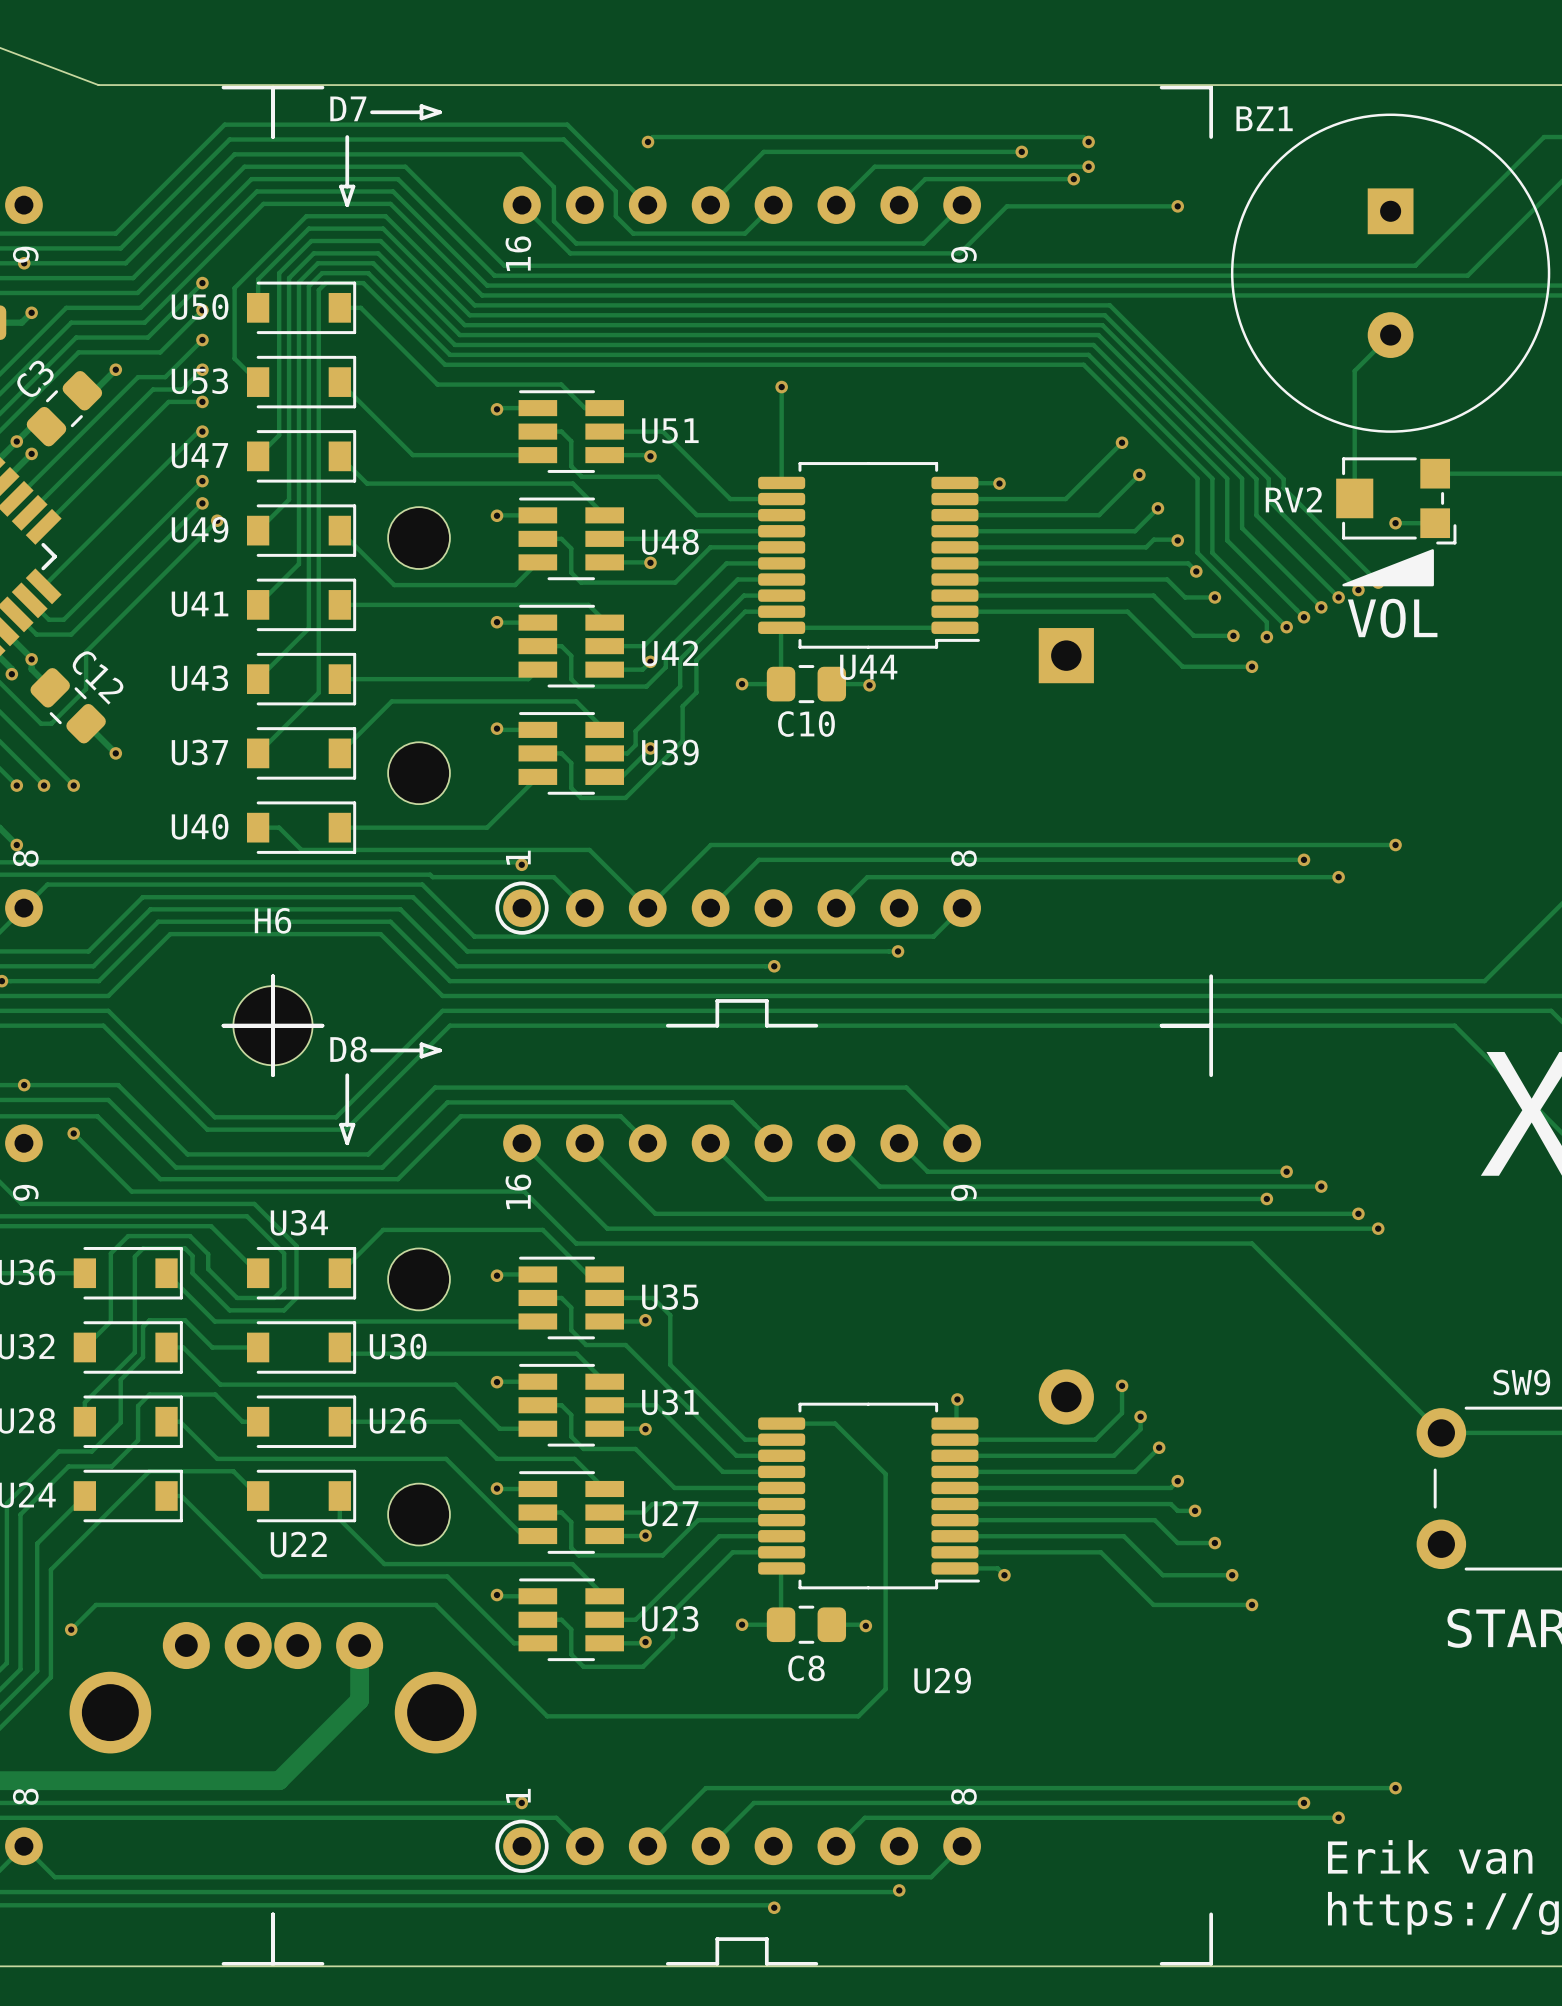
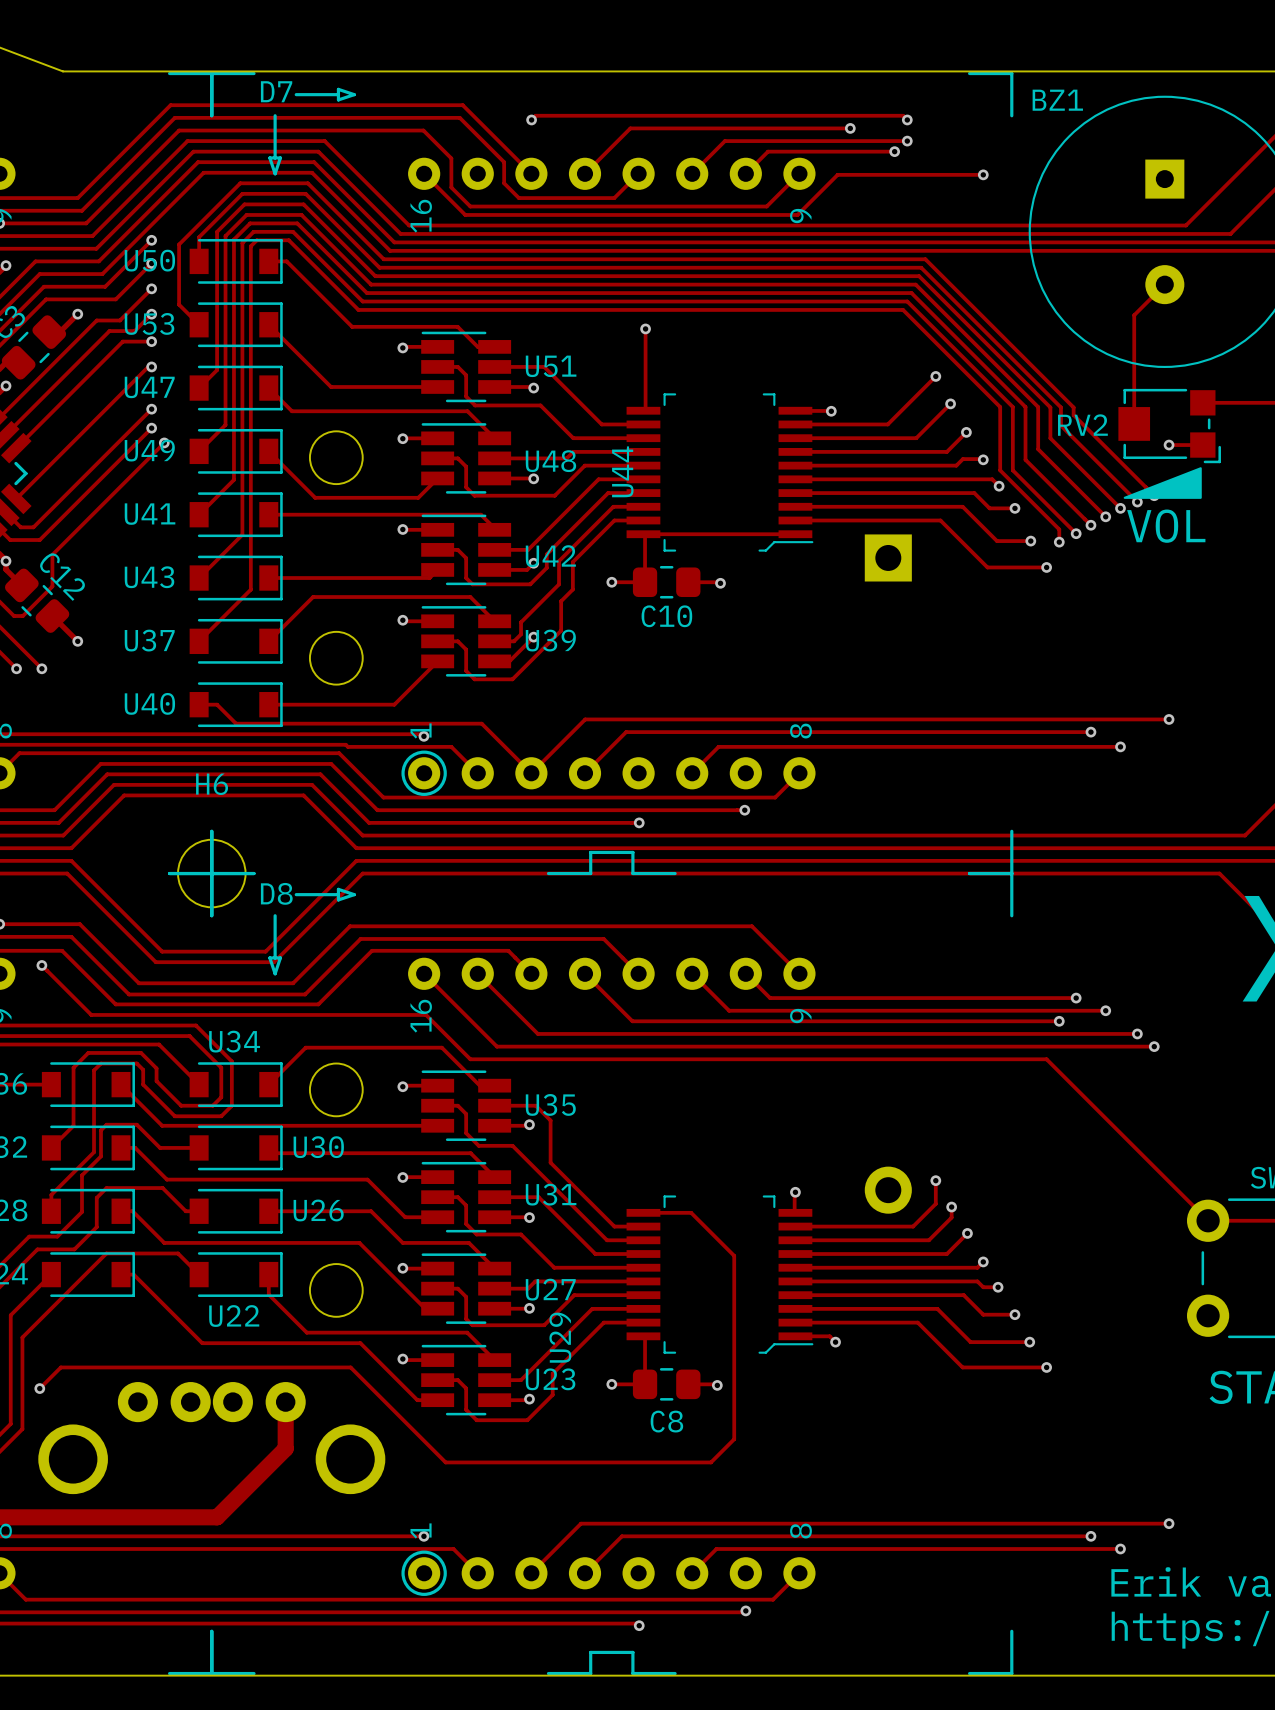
U44 footprint: [758, 462, 980, 649] -> [626, 393, 814, 552]
U44 name position: U44 (868, 667) -> U44 (622, 471)
U29 footprint: [758, 1402, 980, 1590] -> [626, 1195, 814, 1354]
U29 name position: U29 (942, 1680) -> U29 (560, 1337)

